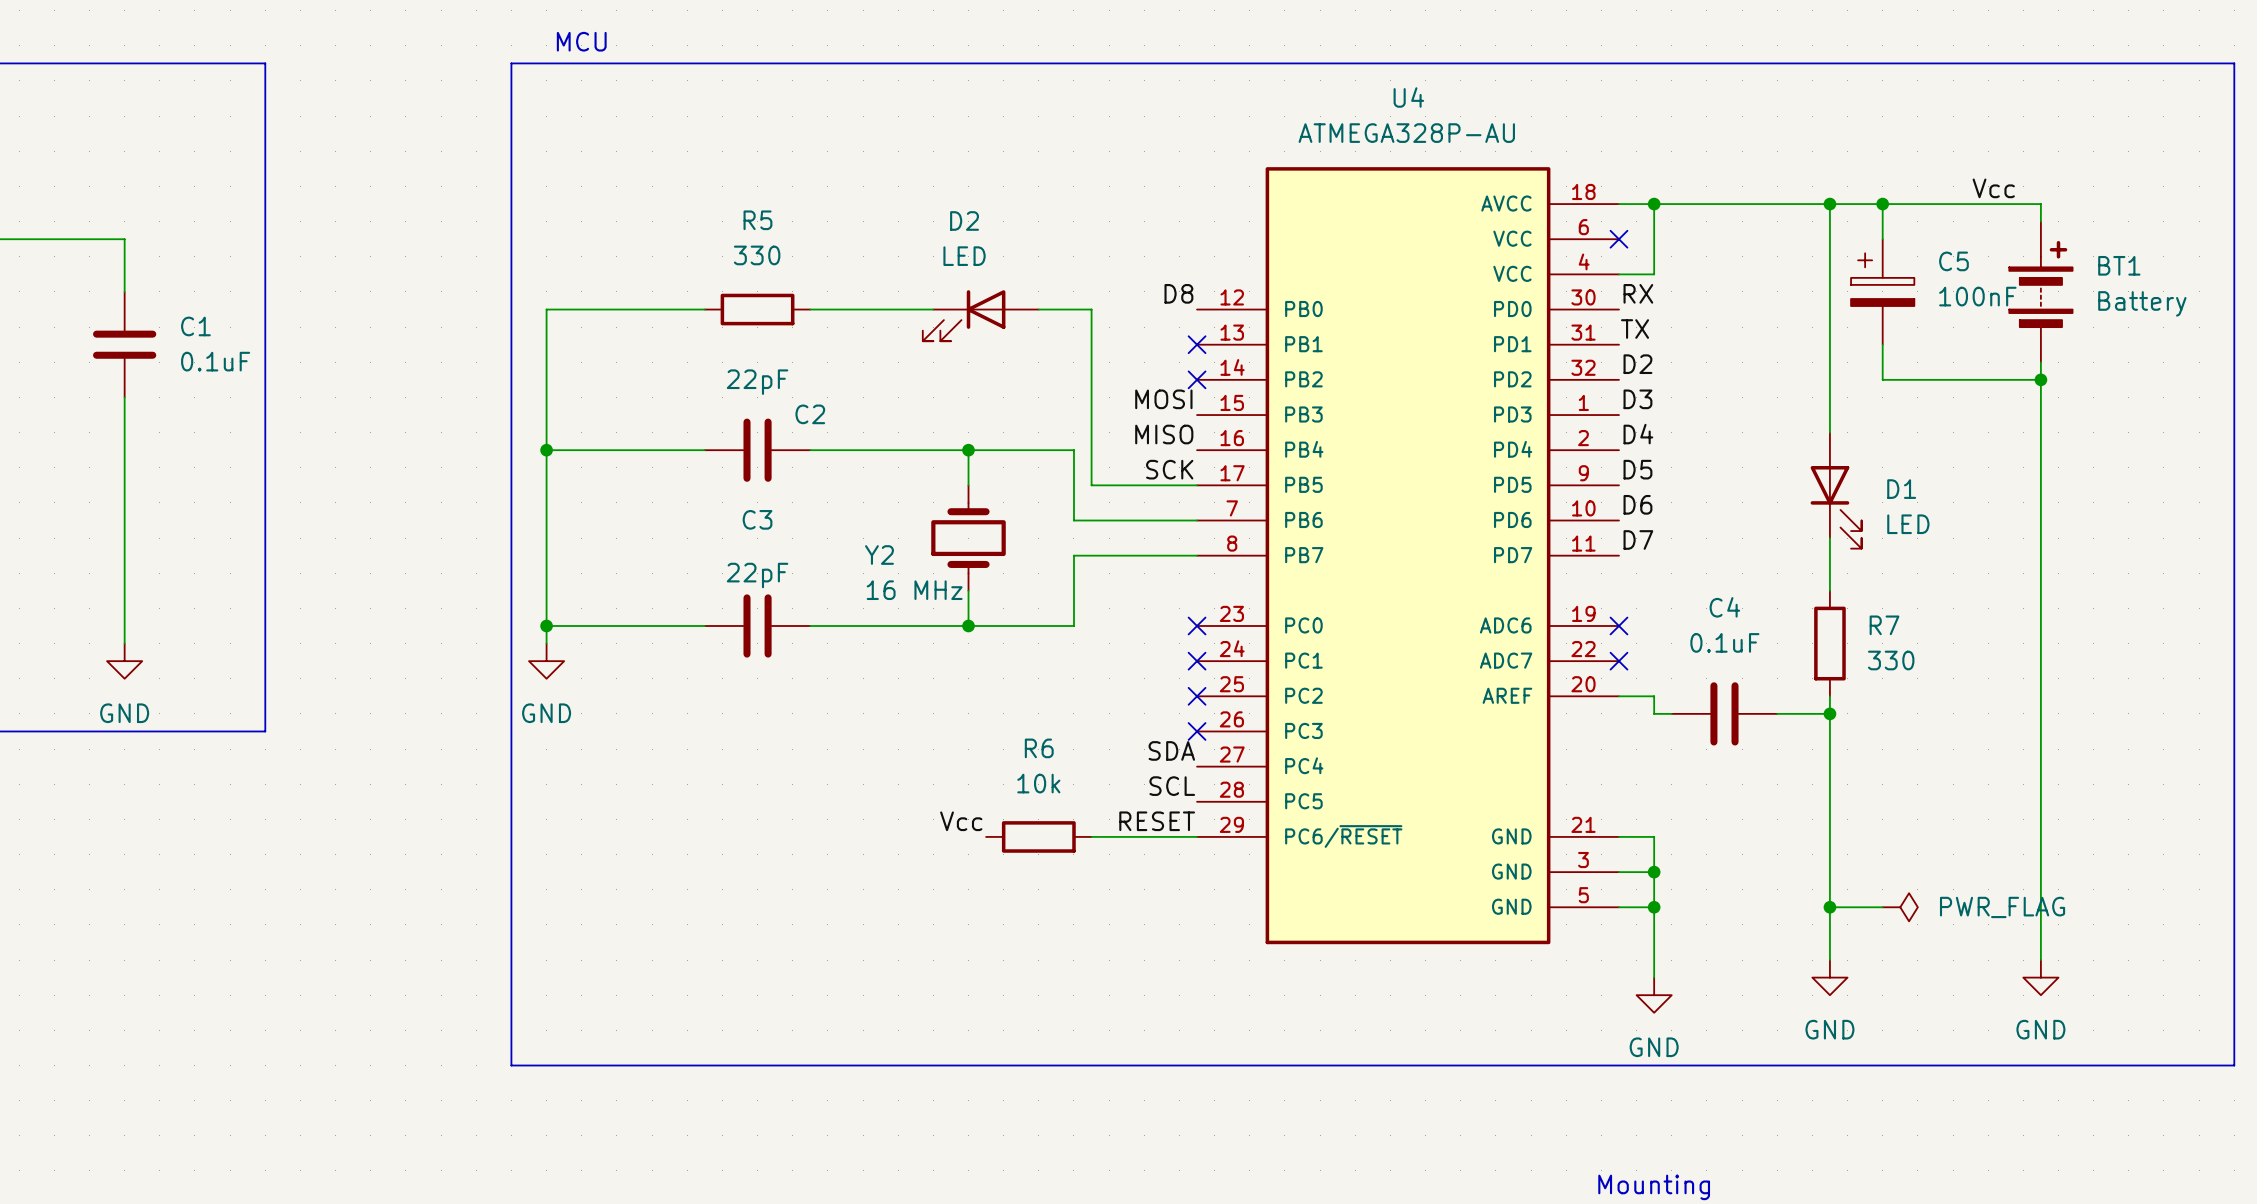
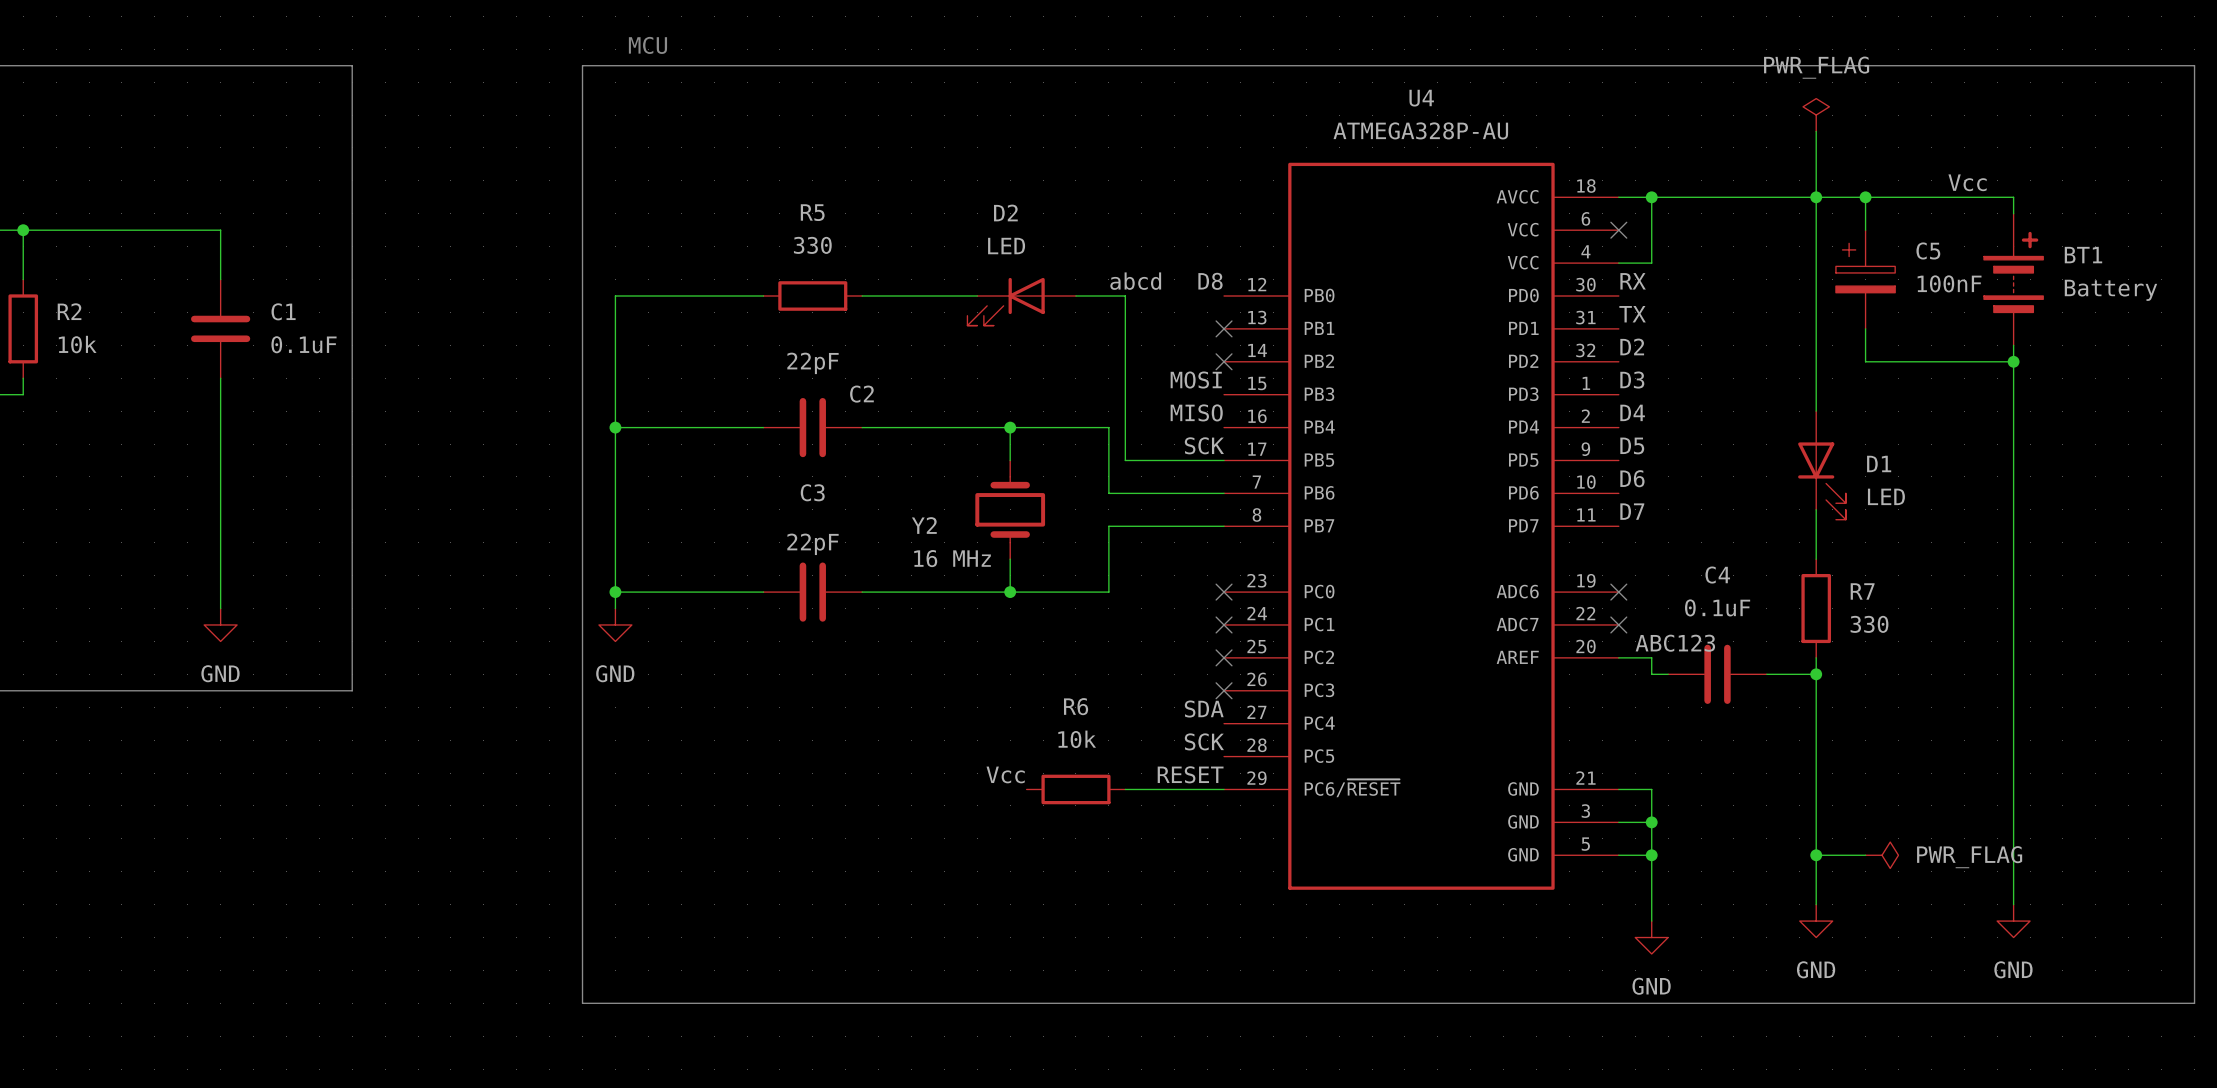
power symbol: none -> PWR_FLAG (1816, 115)
wire: none -> (1816, 131) (1816, 197)
label: none -> abcd (1135, 281)
label: none -> ABC123 (1675, 643)
label: SCL (1172, 786) -> SCK (1204, 741)

